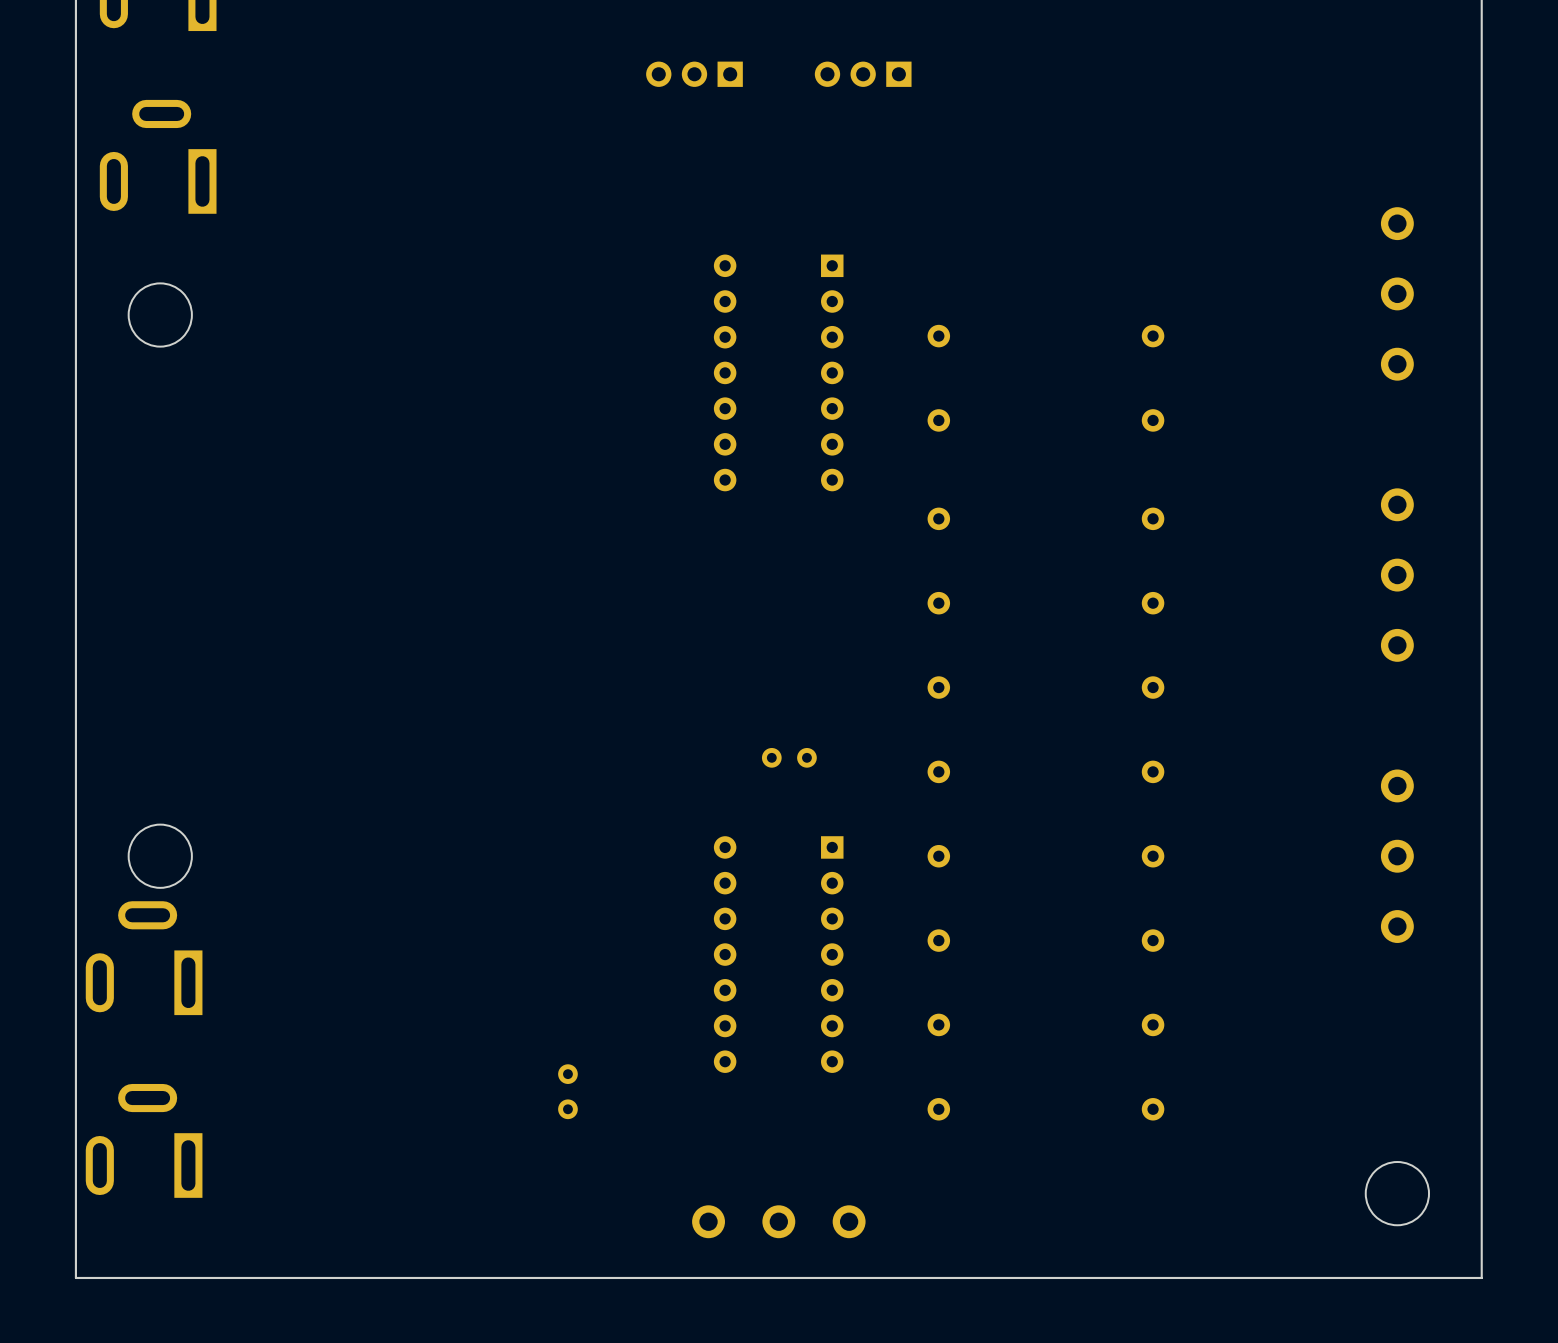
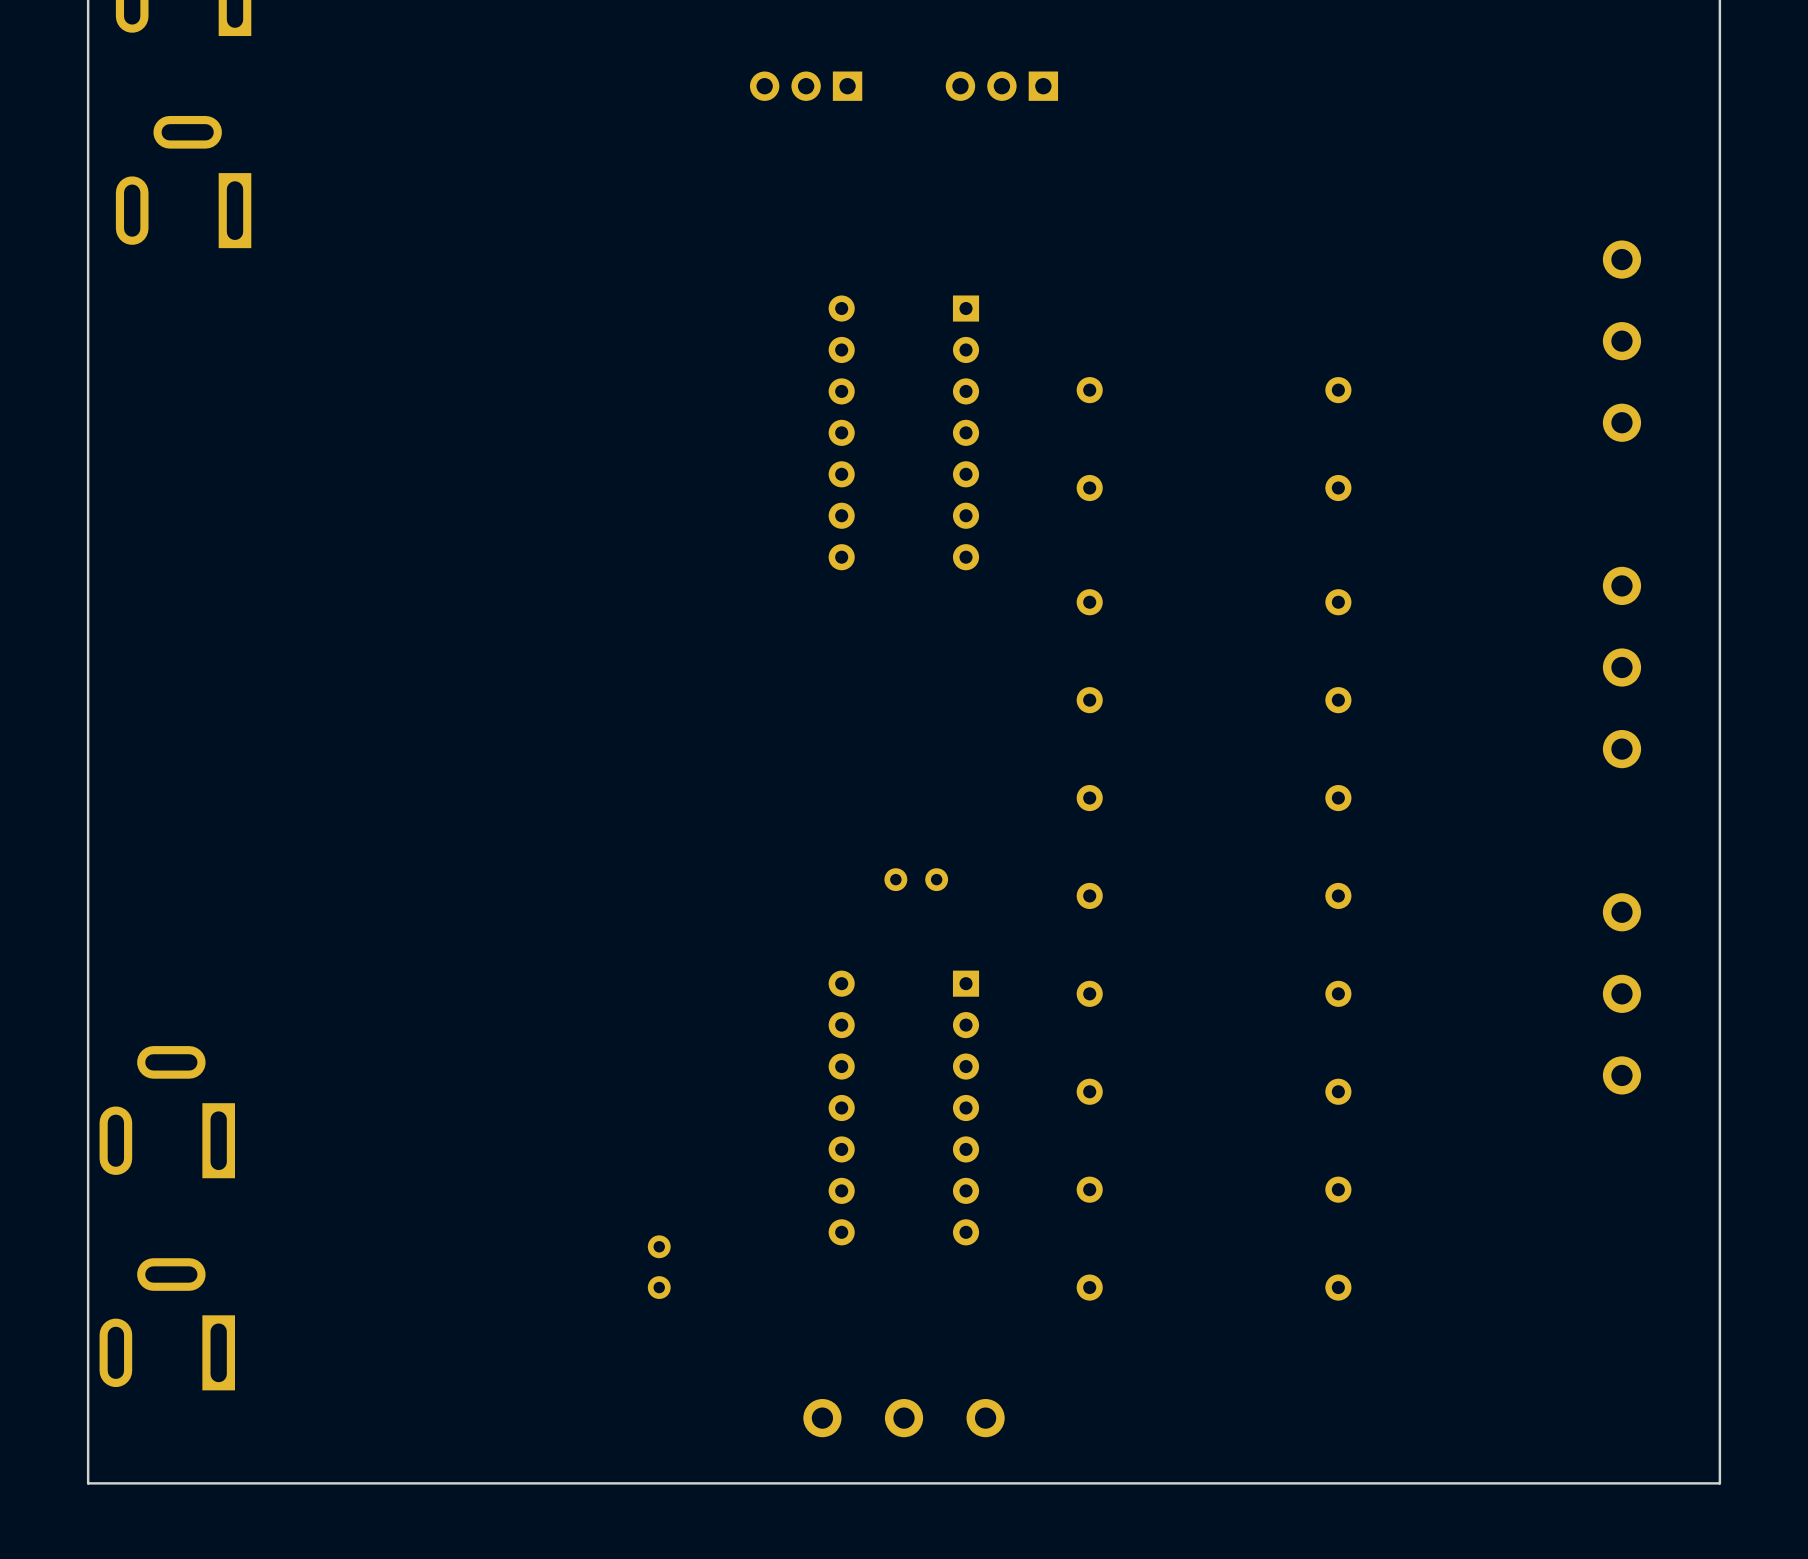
round board edge: [128, 283, 193, 347] -> none
round board edge: [128, 824, 193, 889] -> none
round board edge: [1365, 1161, 1430, 1226] -> none

